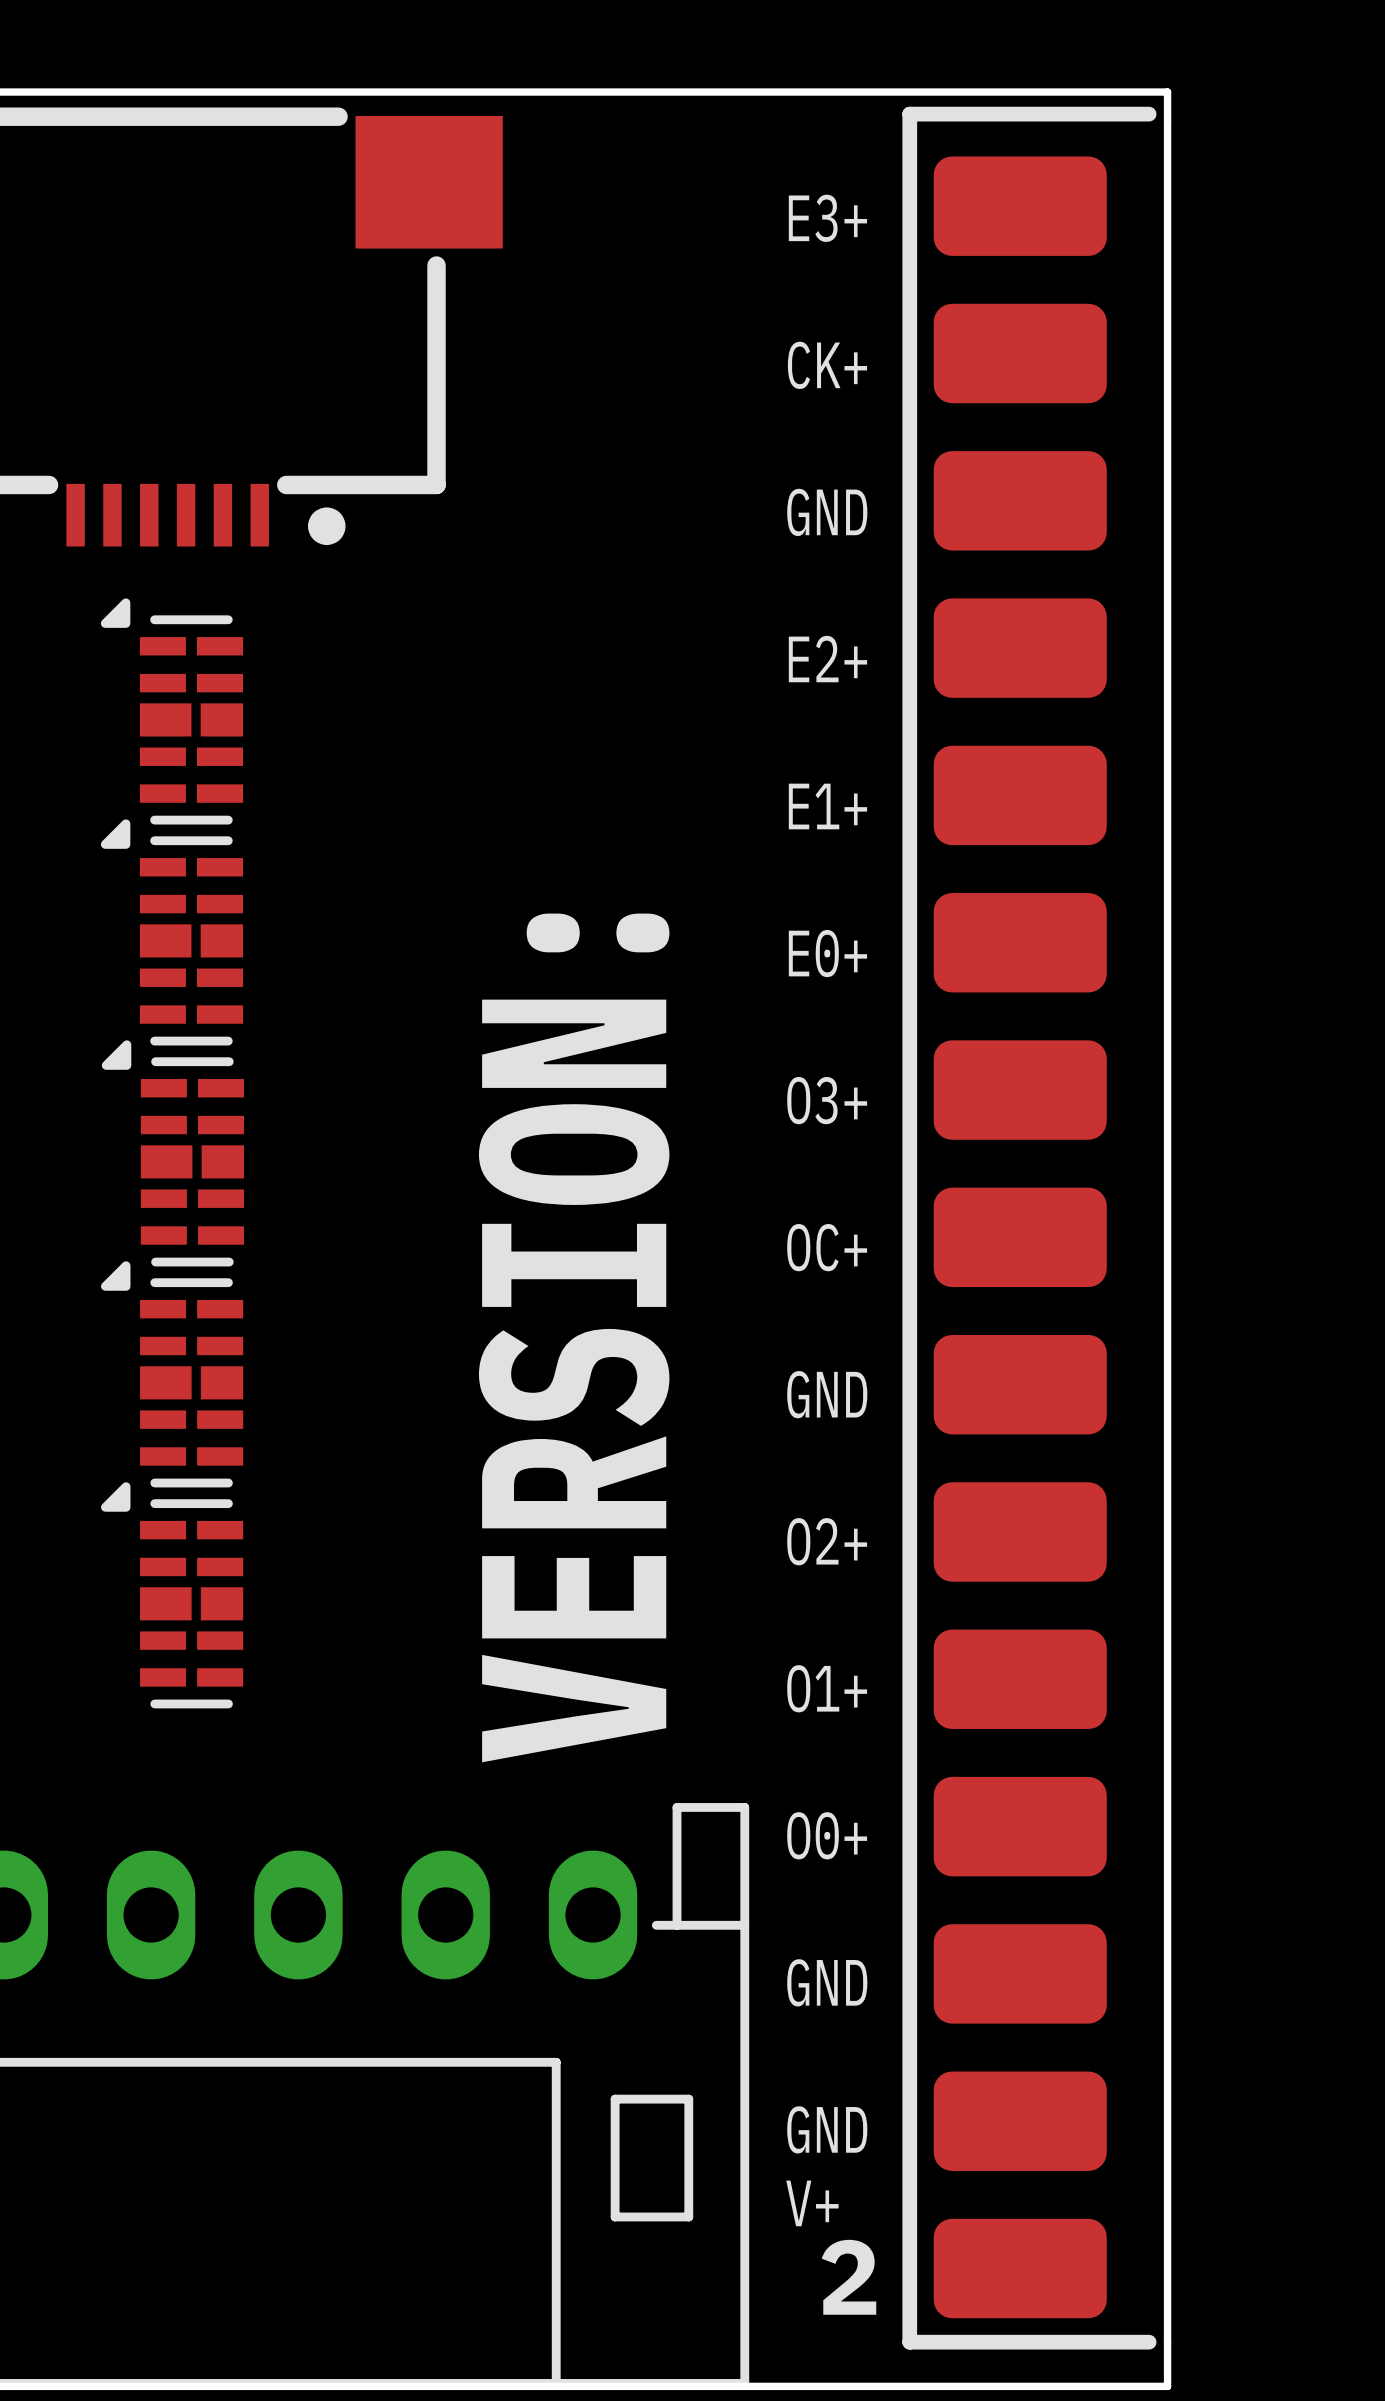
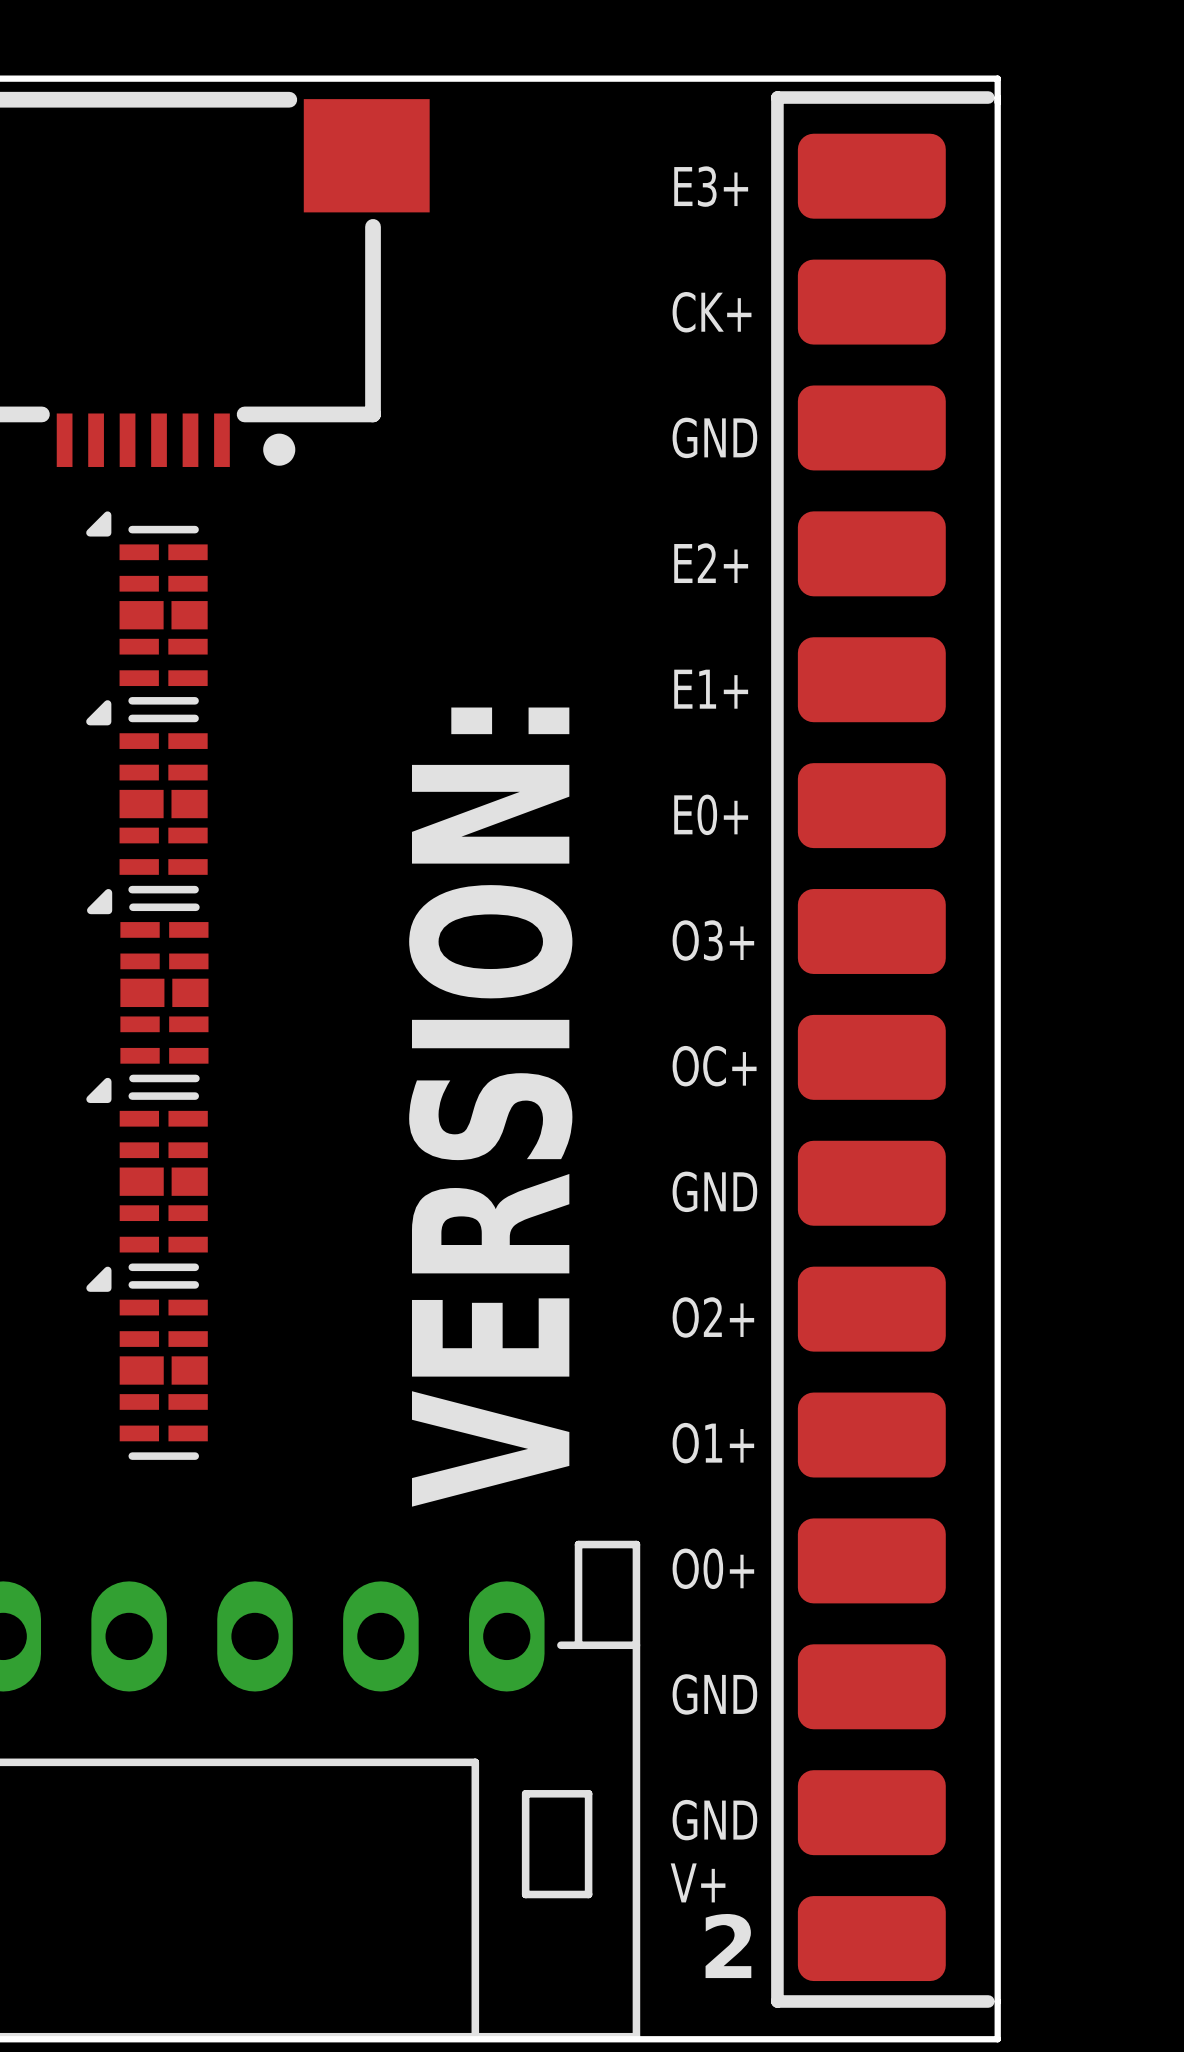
part footprint: [902, 106, 1172, 2350] -> [771, 91, 1001, 2008]

